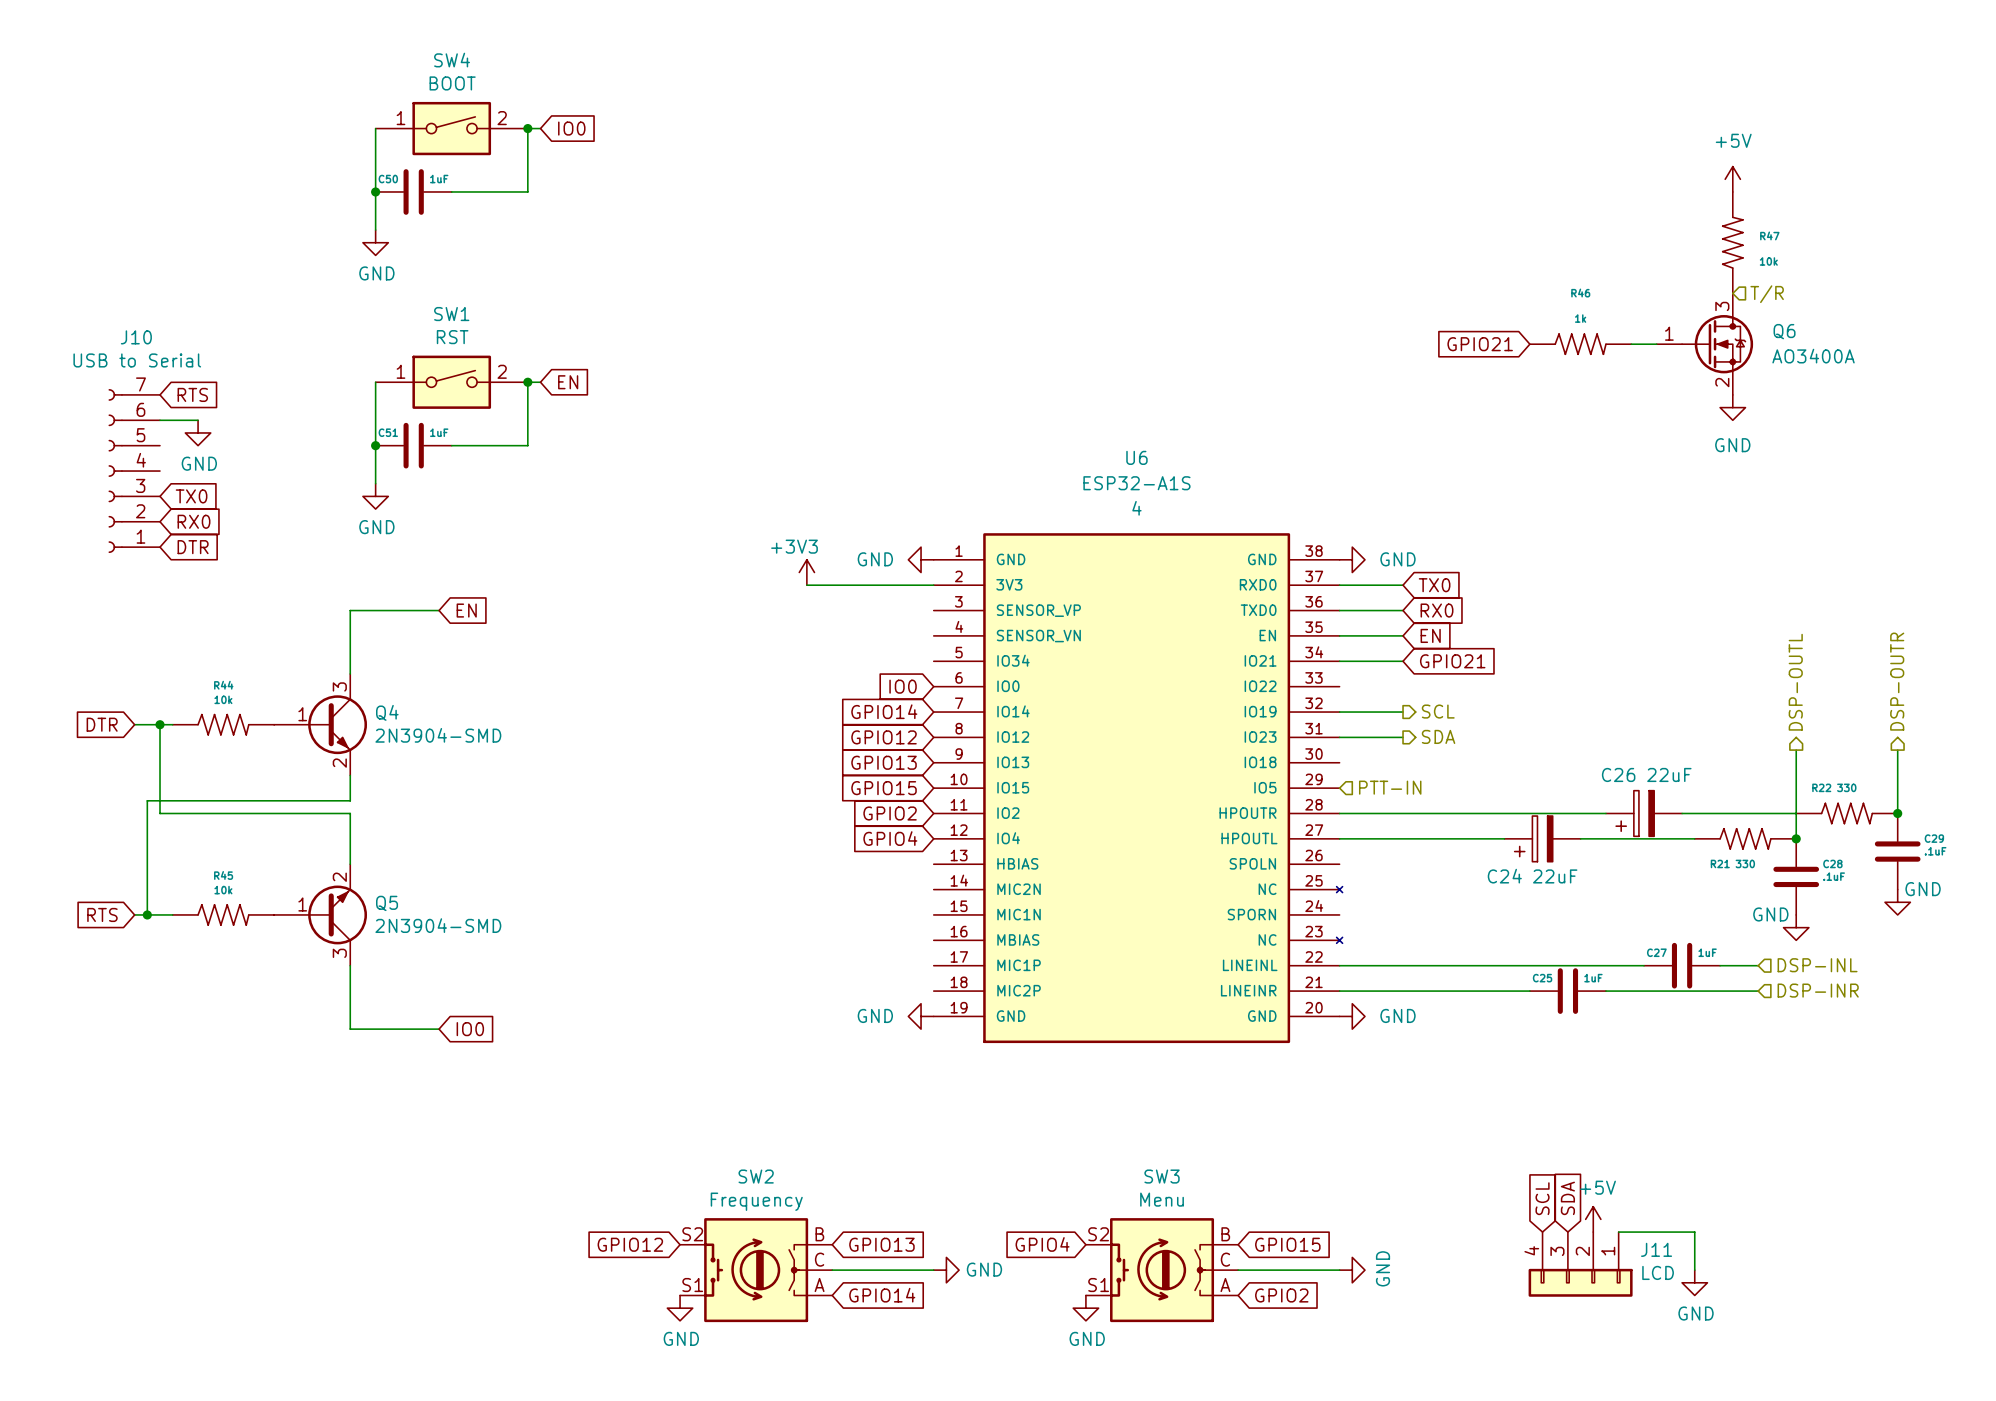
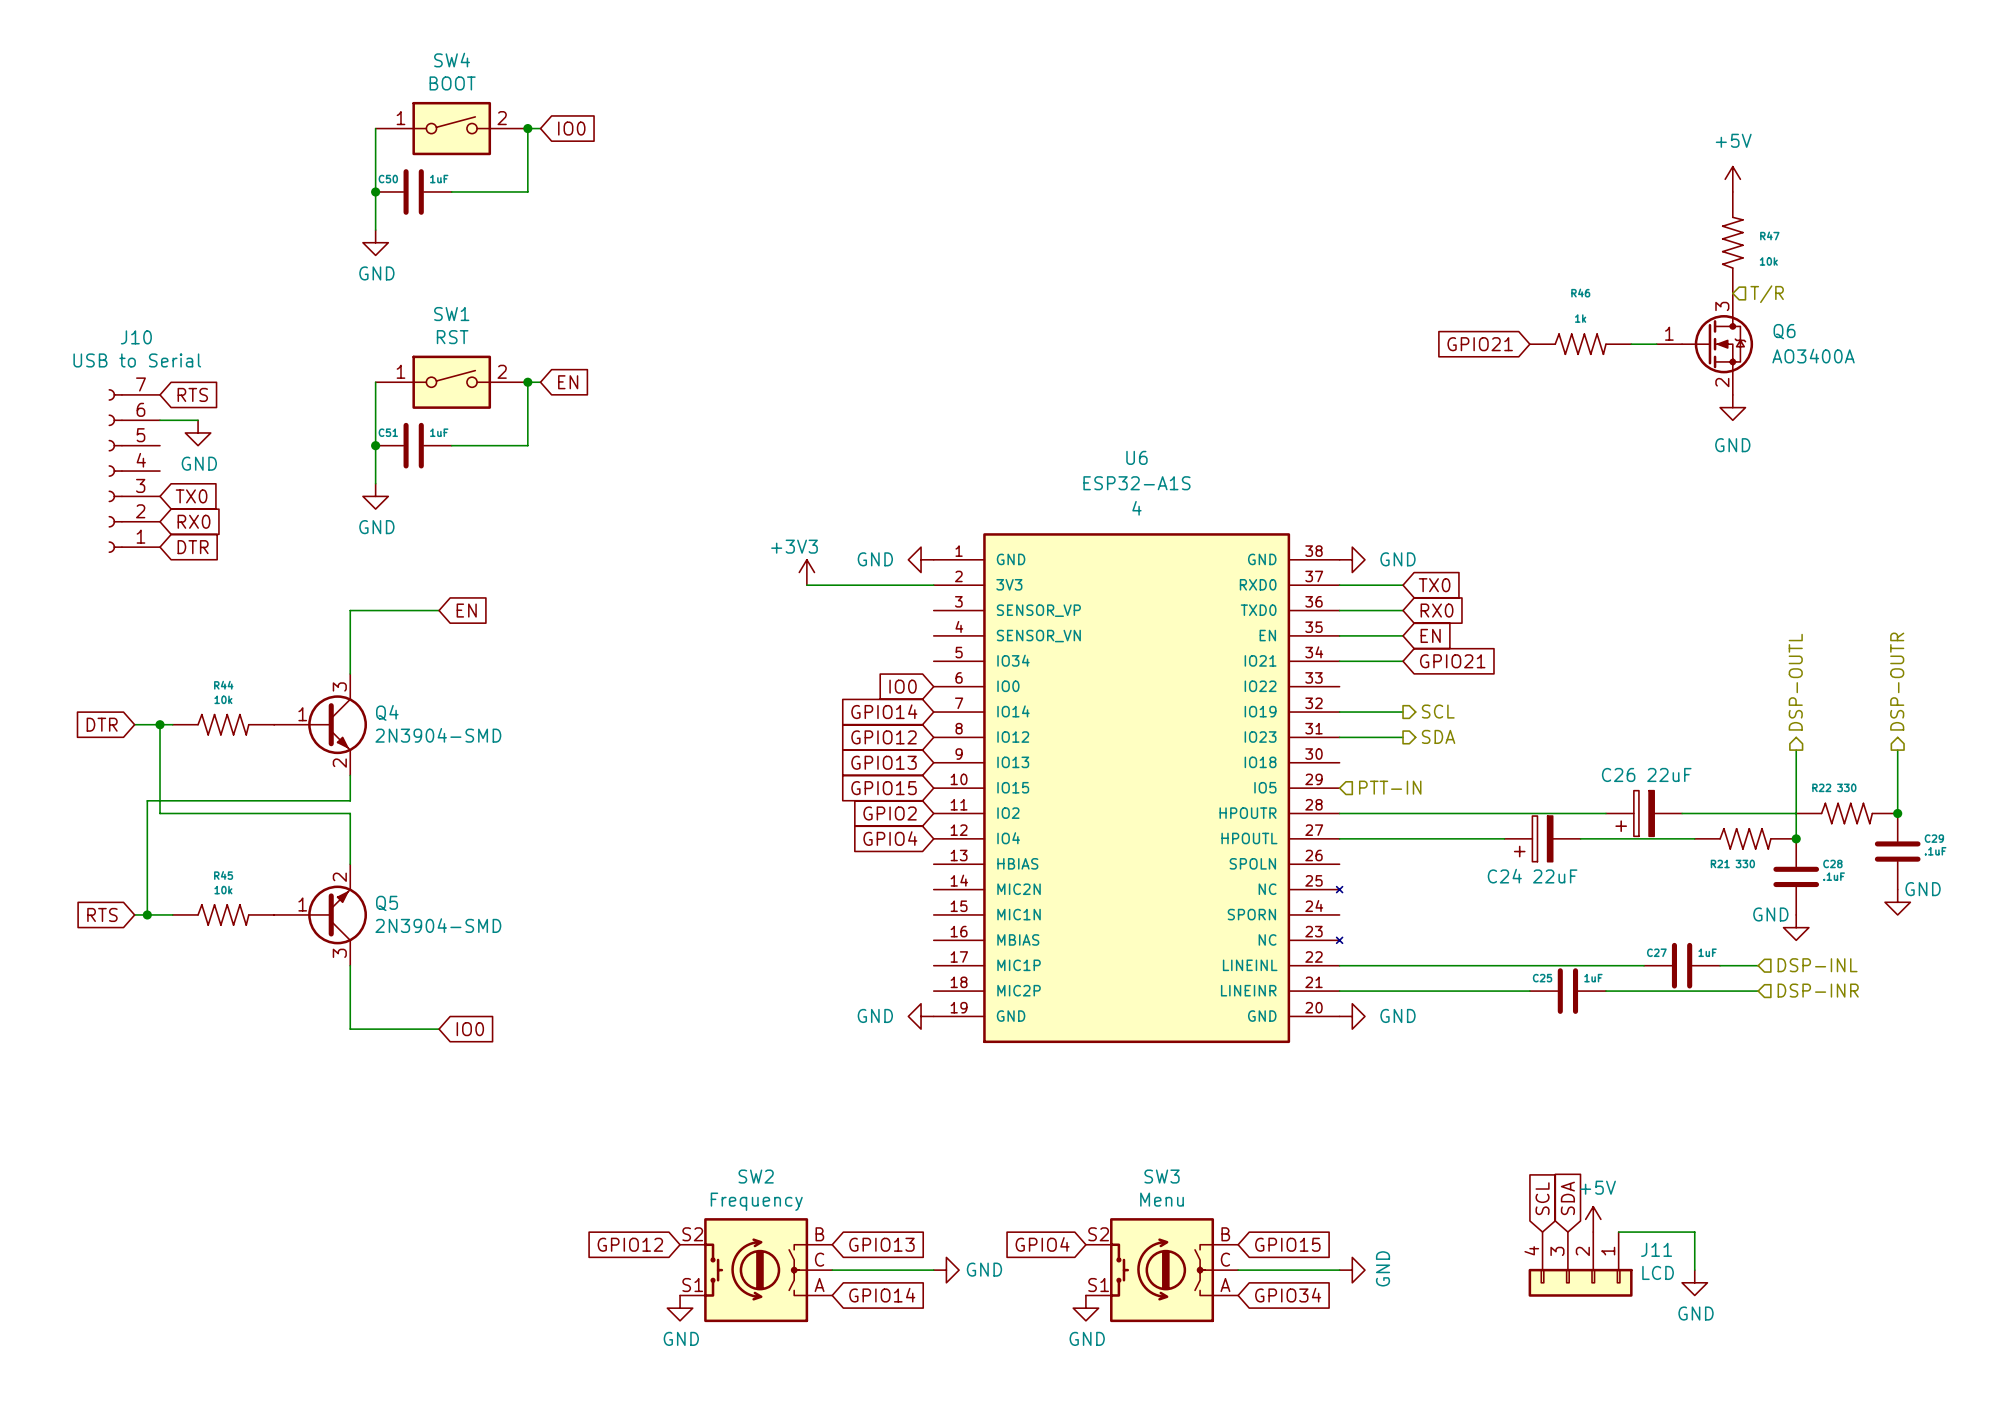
global label: GPIO2 (1281, 1295) -> GPIO34 (1288, 1295)

